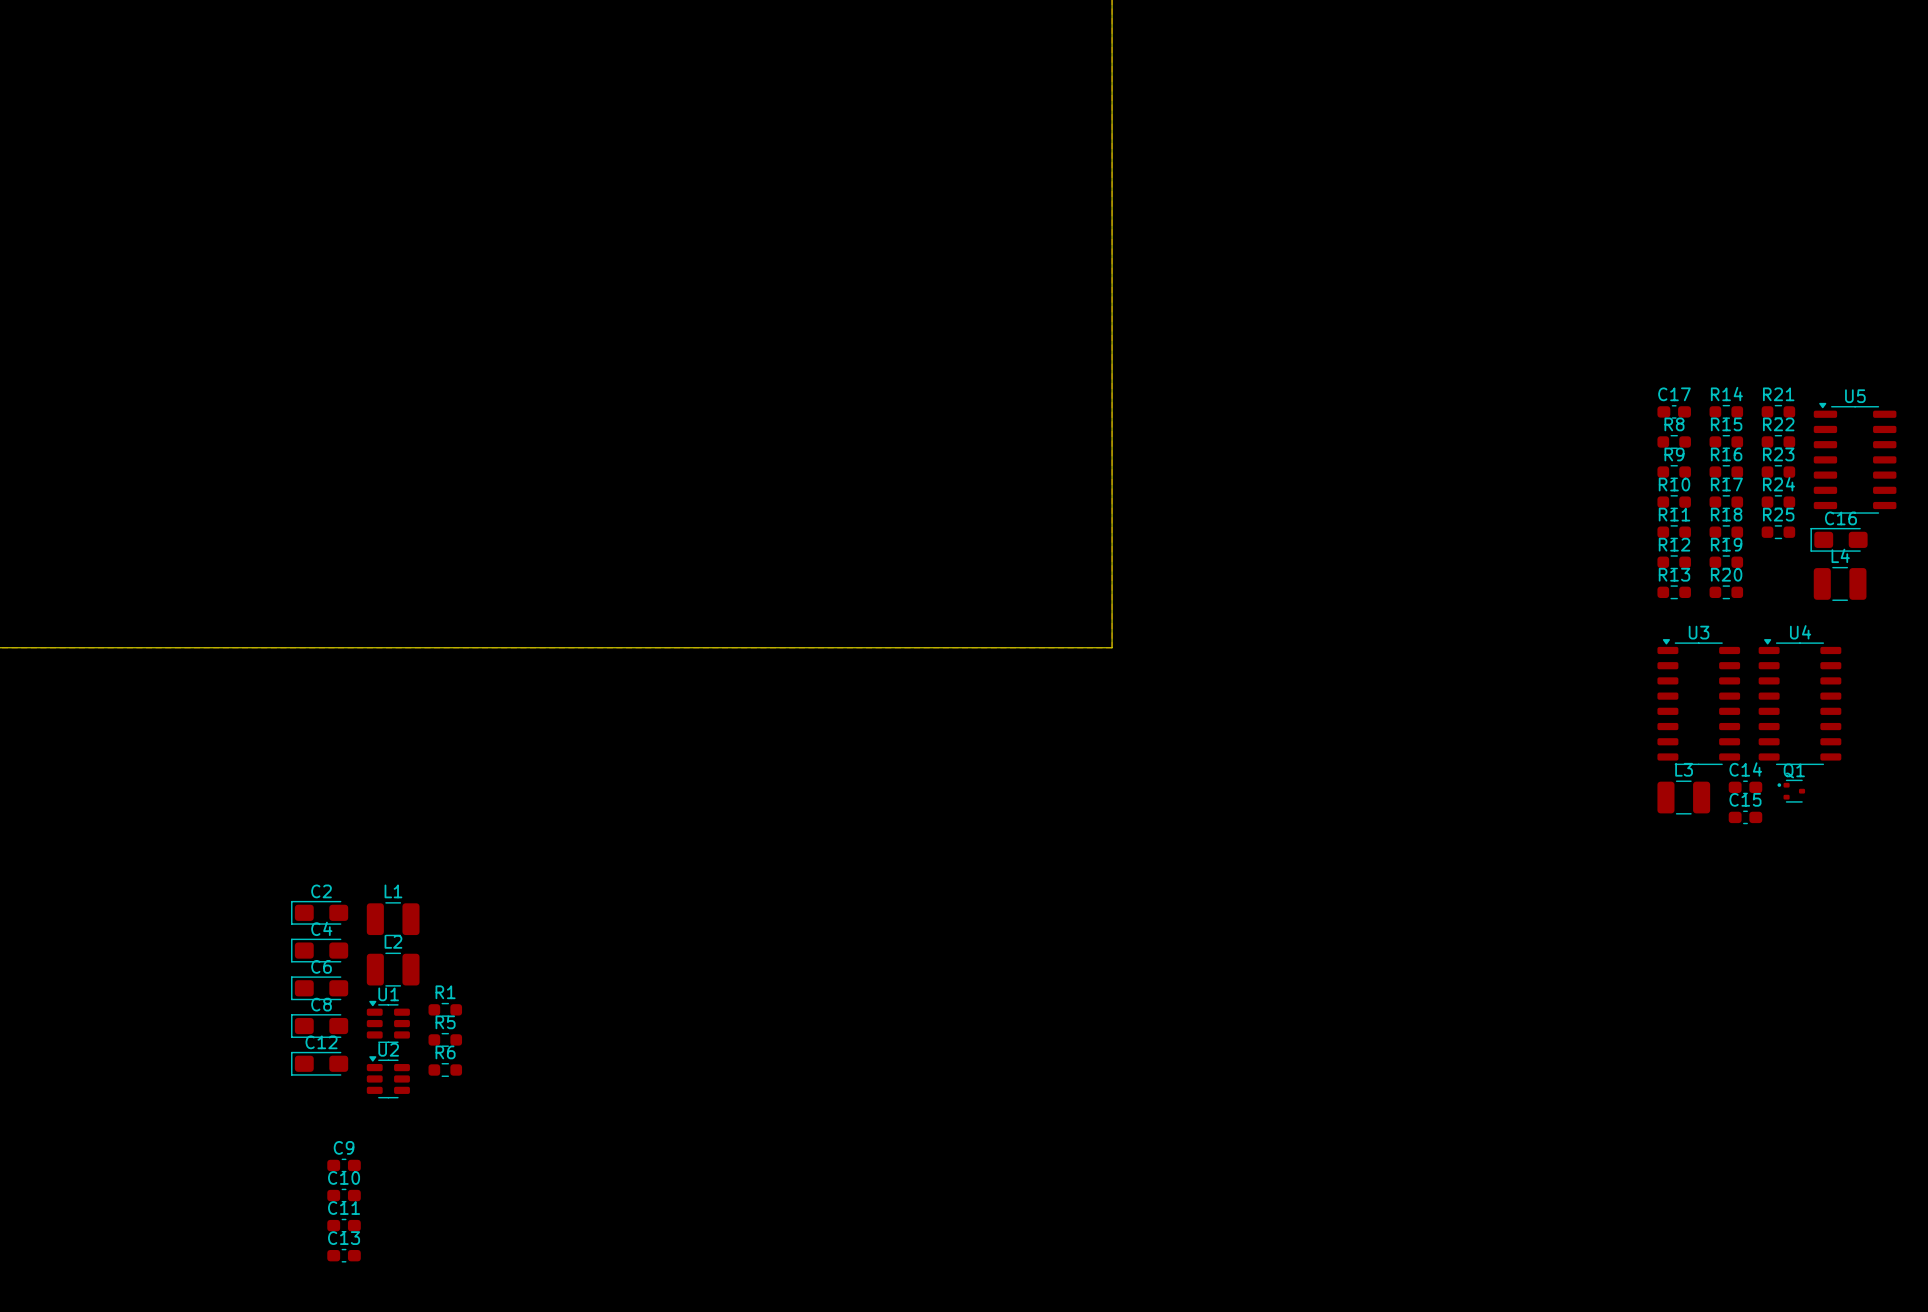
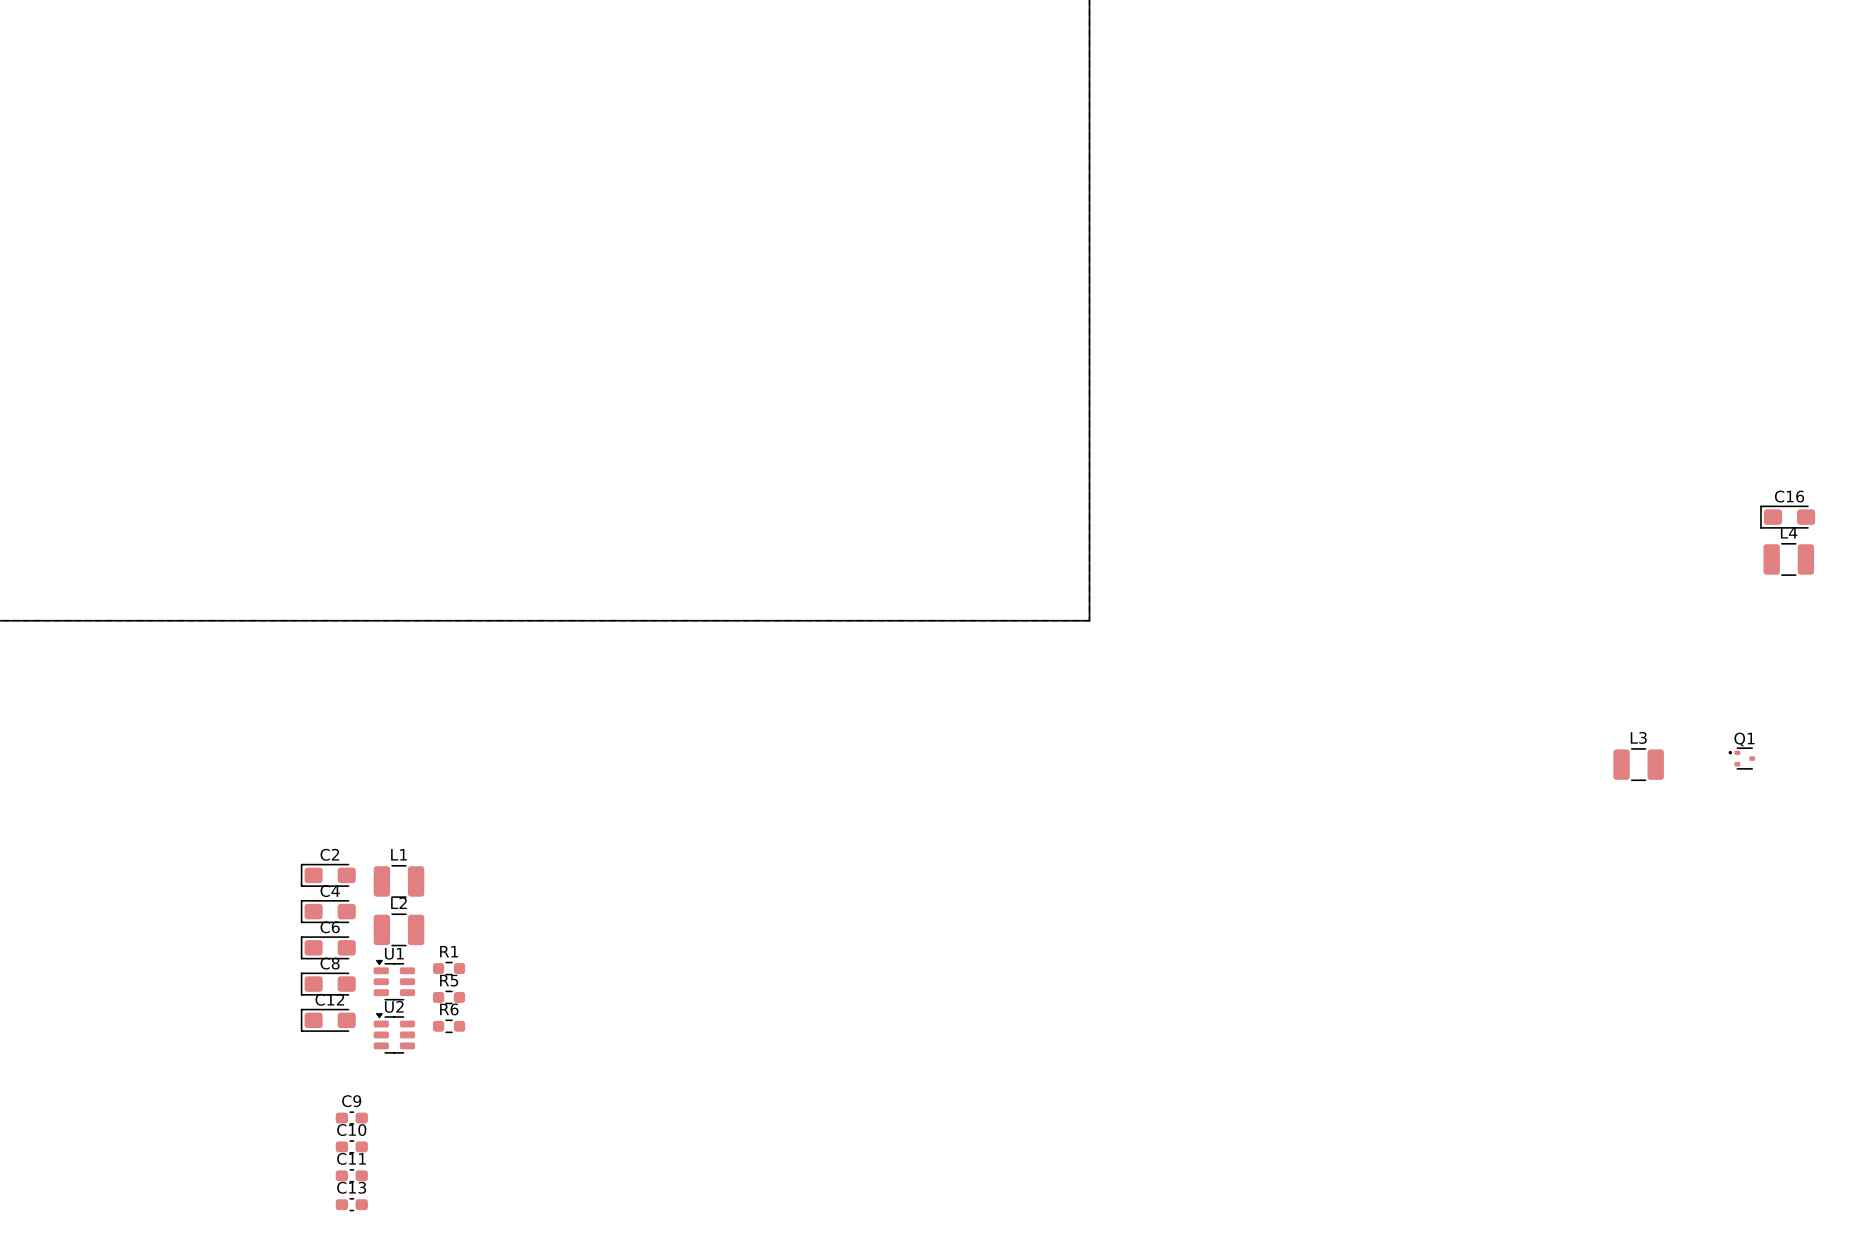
C17: (1674, 411) -> none
R14: (1726, 411) -> none
R21: (1778, 411) -> none
R8: (1674, 441) -> none
R15: (1726, 441) -> none
R22: (1778, 441) -> none
U5: (1855, 458) -> none
R9: (1674, 472) -> none
R16: (1726, 472) -> none
R23: (1778, 472) -> none
R10: (1674, 502) -> none
R17: (1726, 502) -> none
R24: (1778, 502) -> none
R11: (1674, 532) -> none
R18: (1726, 532) -> none
R25: (1778, 532) -> none
R12: (1674, 562) -> none
R19: (1726, 562) -> none
R13: (1674, 592) -> none
R20: (1726, 592) -> none
U3: (1698, 702) -> none
U4: (1799, 702) -> none
C14: (1745, 787) -> none
C15: (1745, 817) -> none

